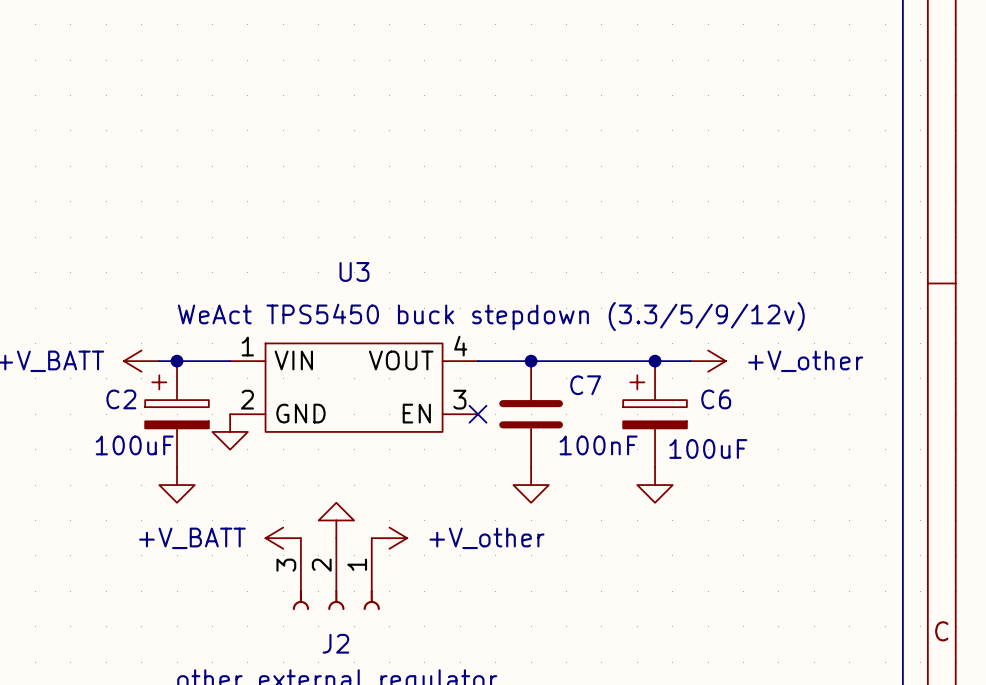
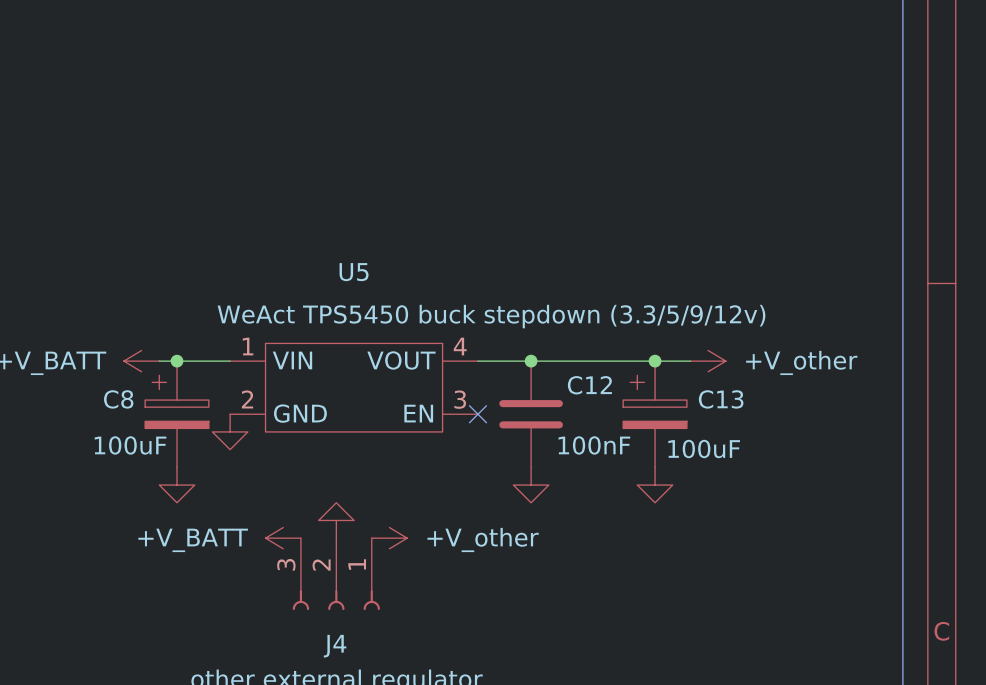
U3 name: U3 (354, 271) -> U5 (354, 272)
C7 name: C7 (585, 385) -> C12 (589, 385)
C2 name: C2 (121, 399) -> C8 (118, 399)
C6 name: C6 (716, 399) -> C13 (721, 399)
J2 name: J2 (335, 643) -> J4 (335, 646)

